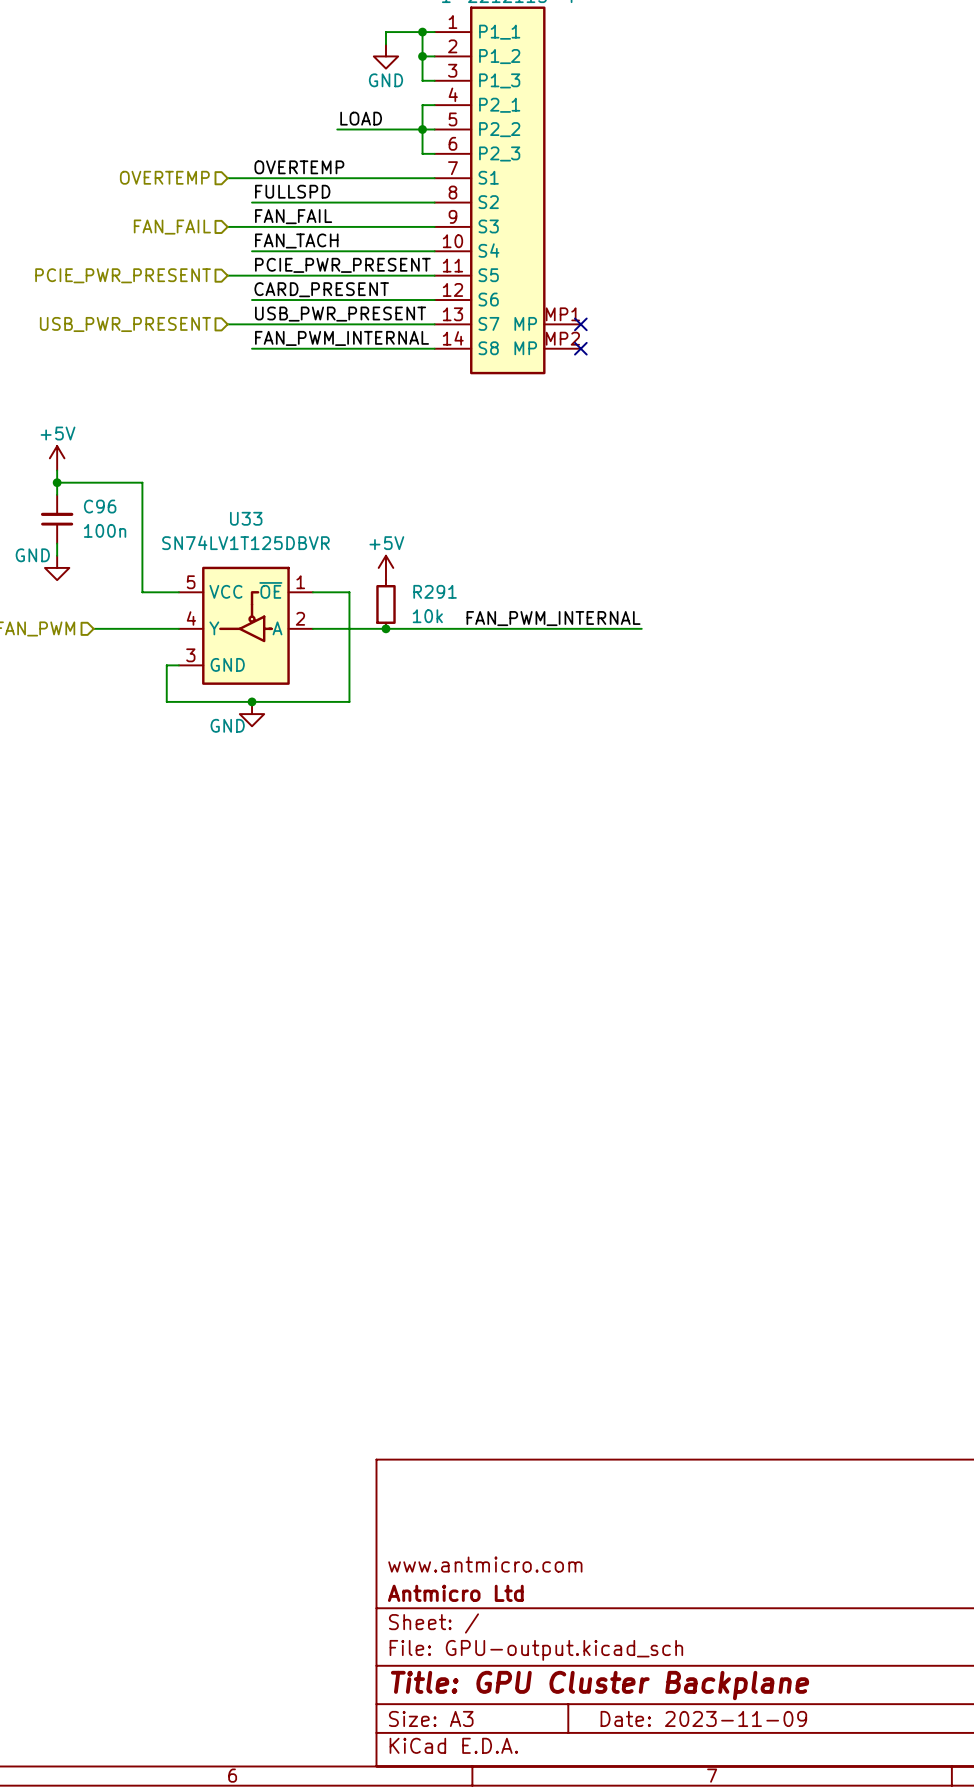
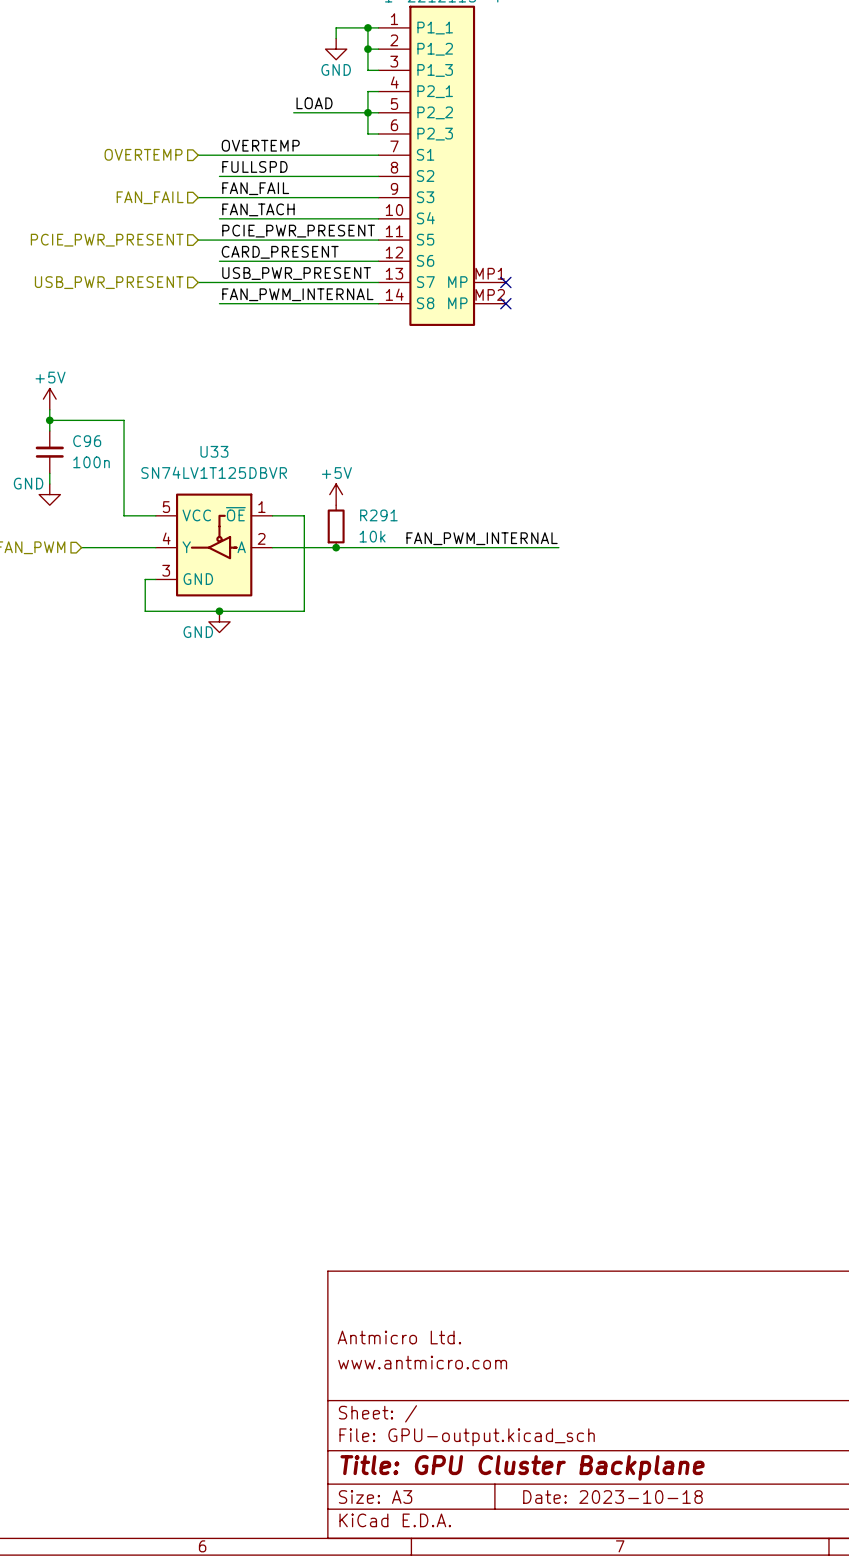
title block: none -> Antmicro Ltd. (399, 1337)
title block: Antmicro Ltd (455, 1593) -> none
title block: Date: 2023-11-09 (703, 1718) -> Date: 2023-10-18 (612, 1497)

